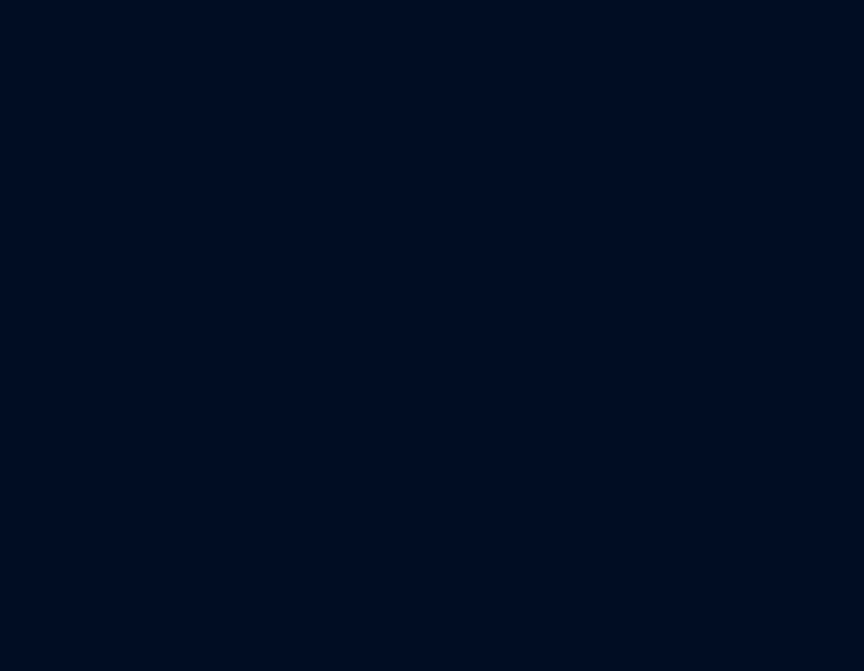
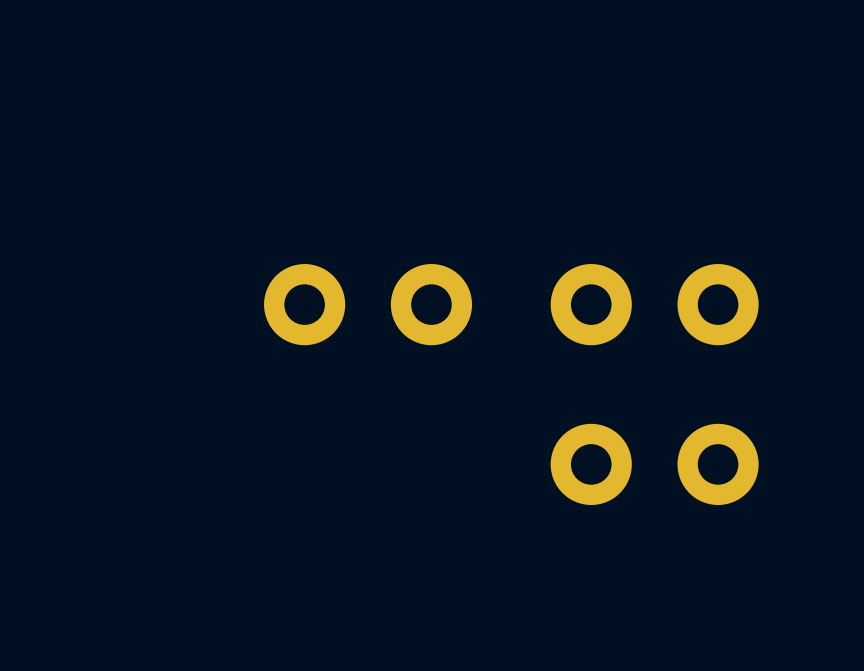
part: none -> (368, 304)
part: none -> (654, 304)
part: none -> (654, 464)

